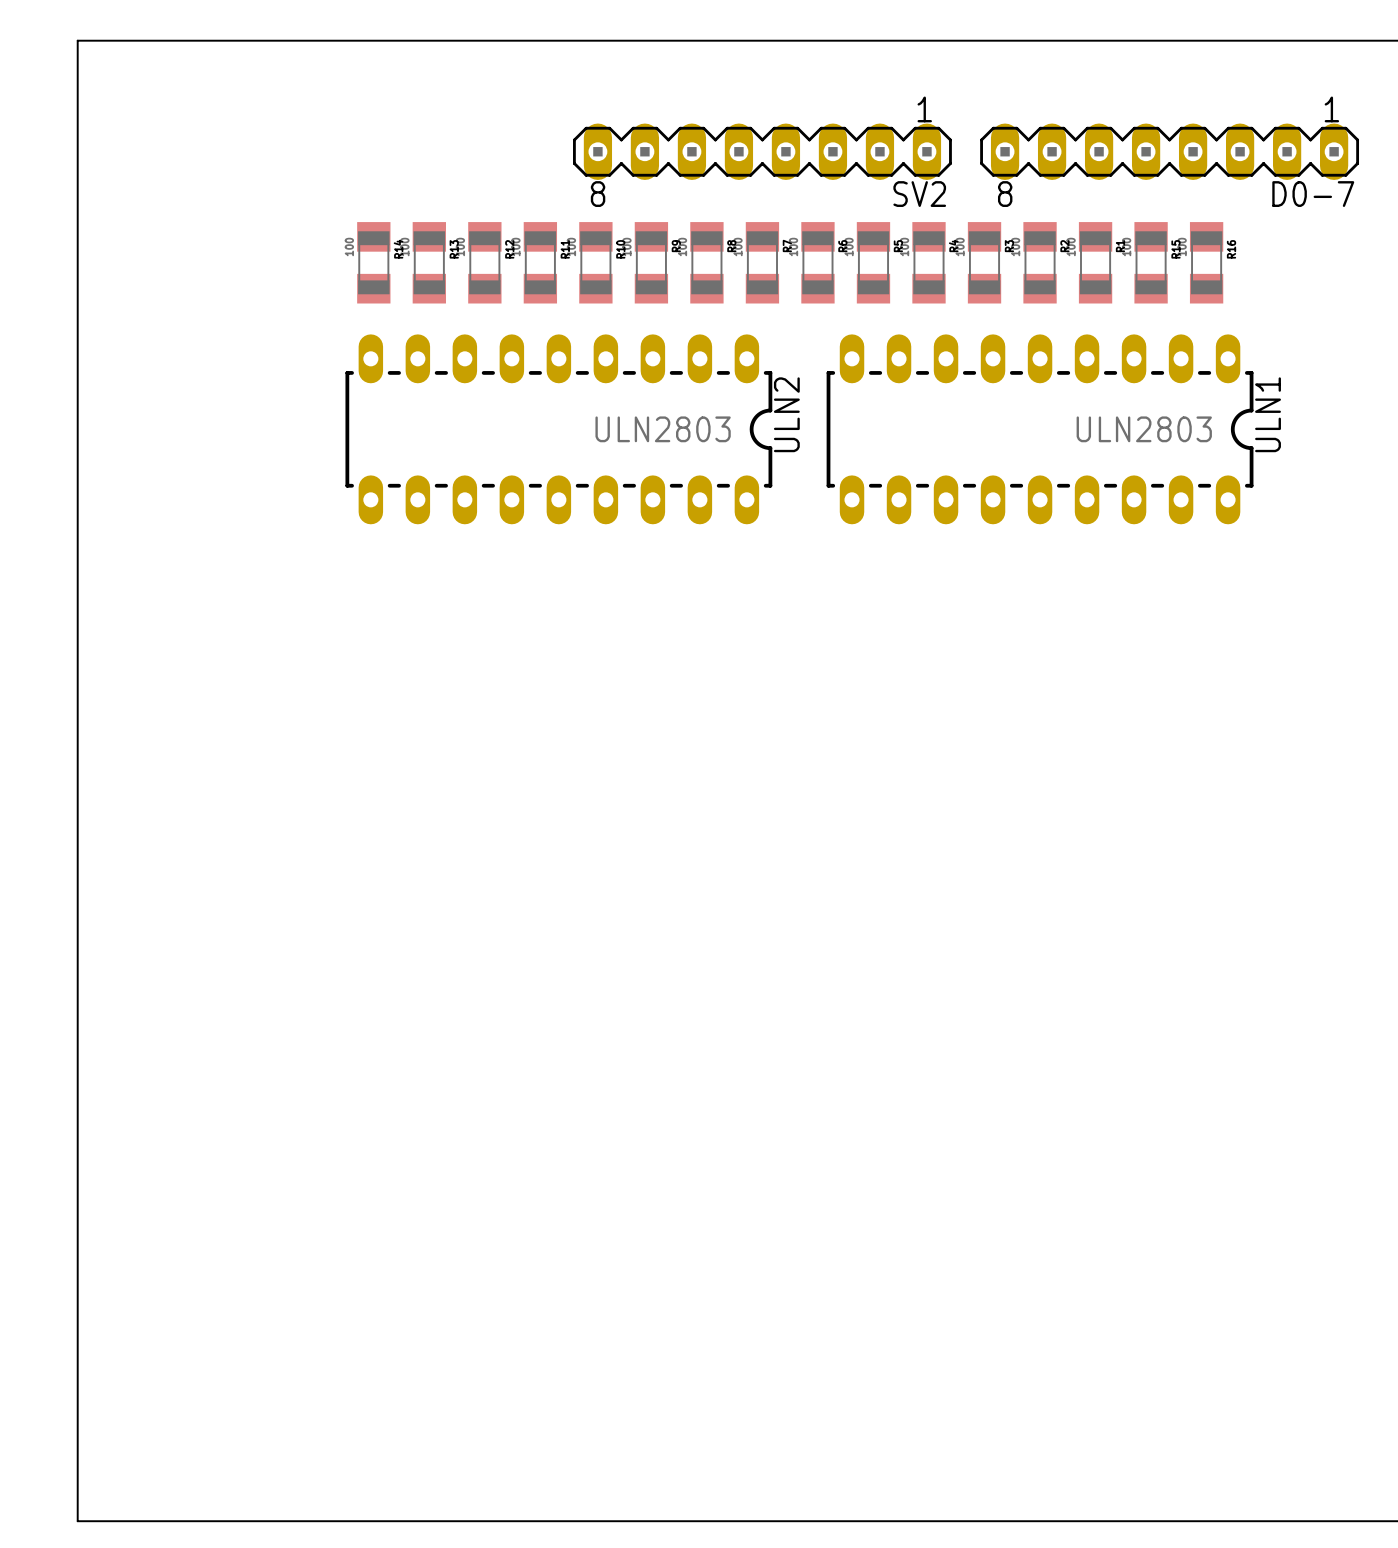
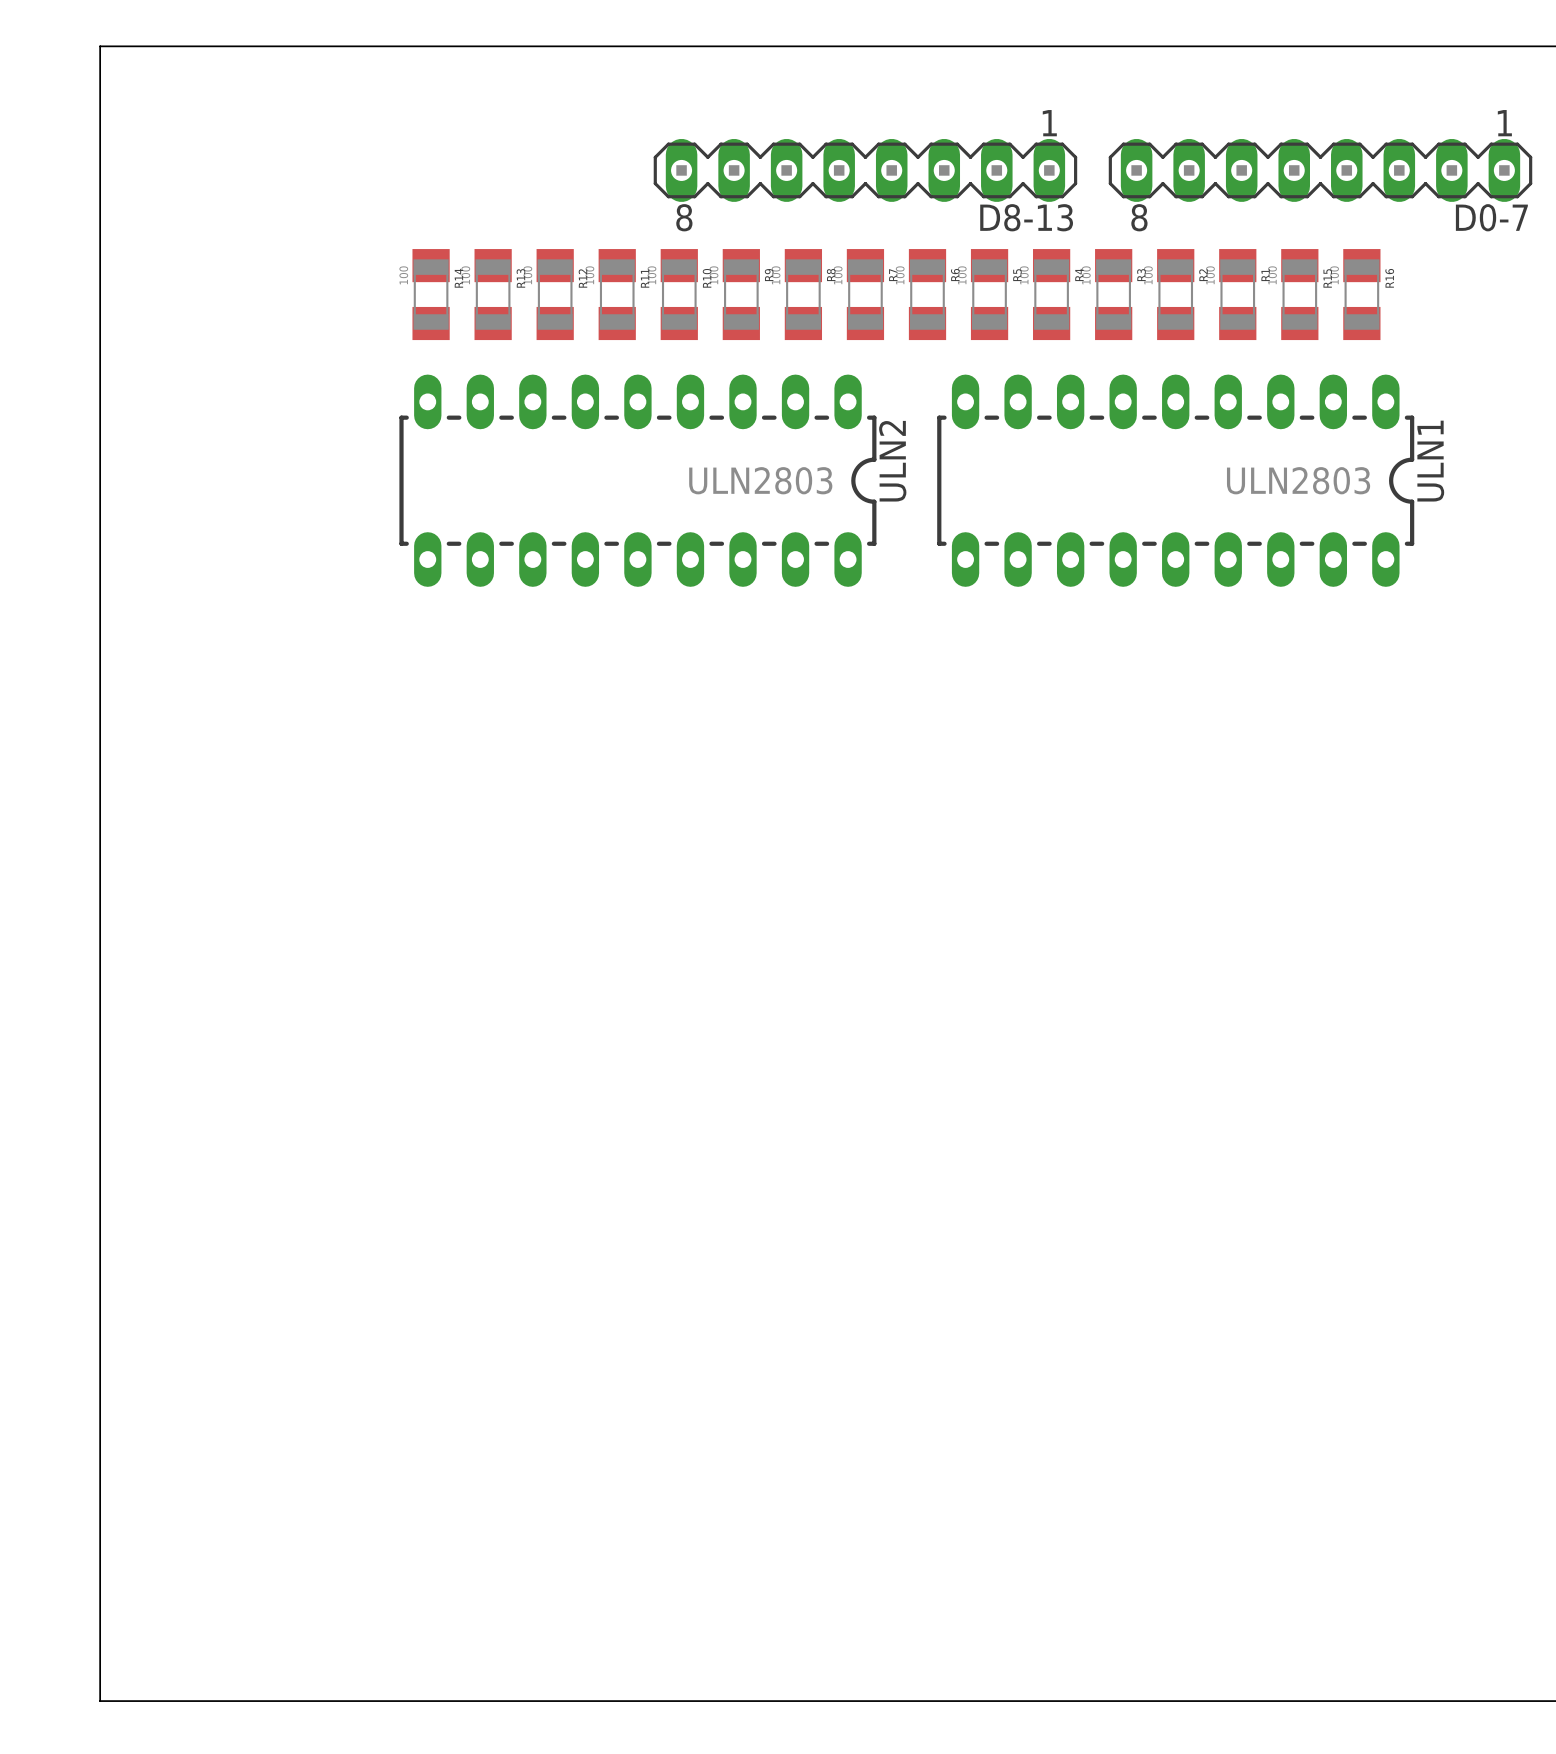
SV2 name: SV2 (919, 194) -> D8-13 (1026, 217)

